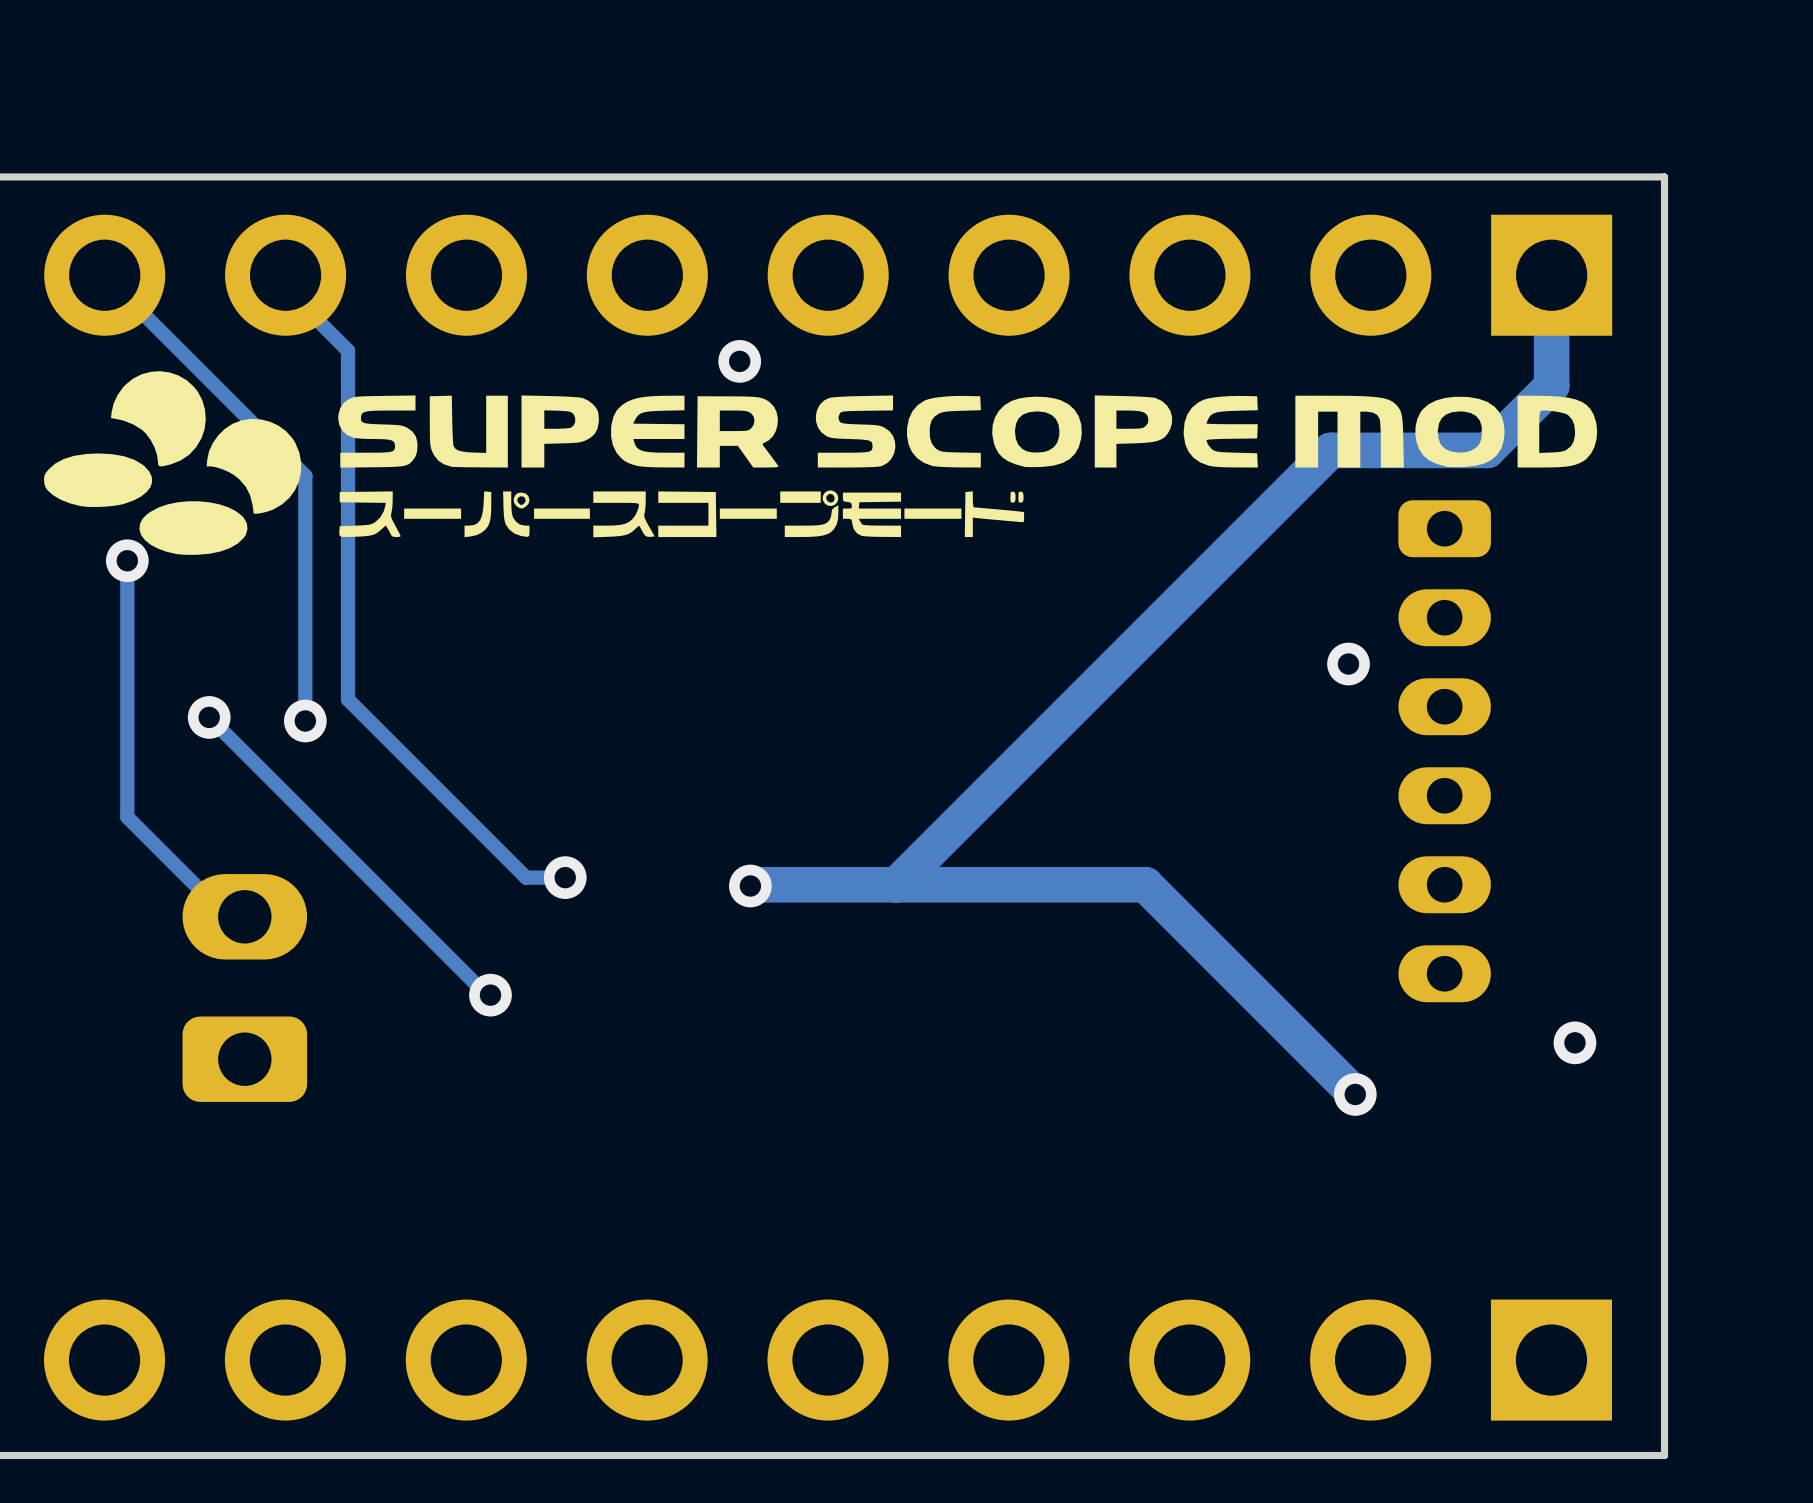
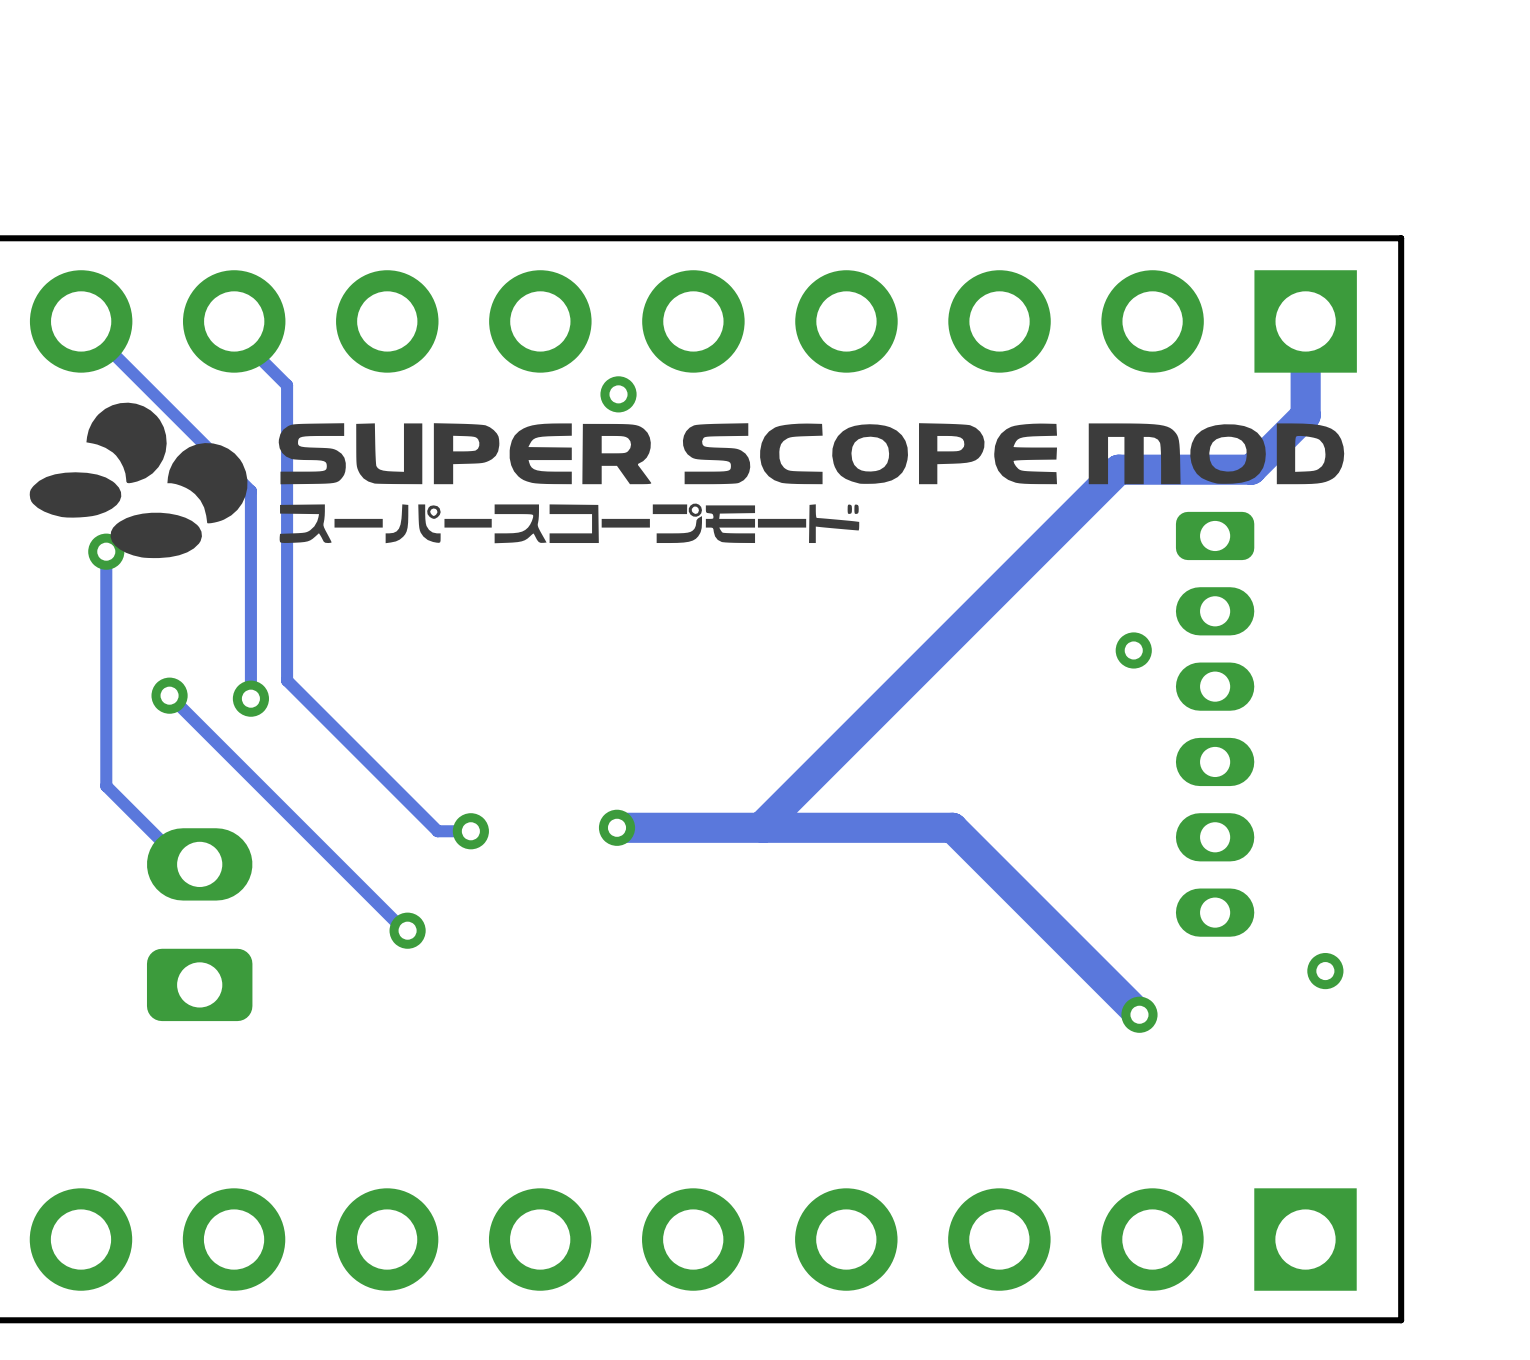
track: (127, 560) (127, 817) (134, 824) -> (106, 551) (106, 786)
via position: (127, 560) -> (106, 551)
track: (1145, 884) (750, 886) -> (962, 837) (952, 827) (617, 827)
via position: (750, 886) -> (617, 827)

